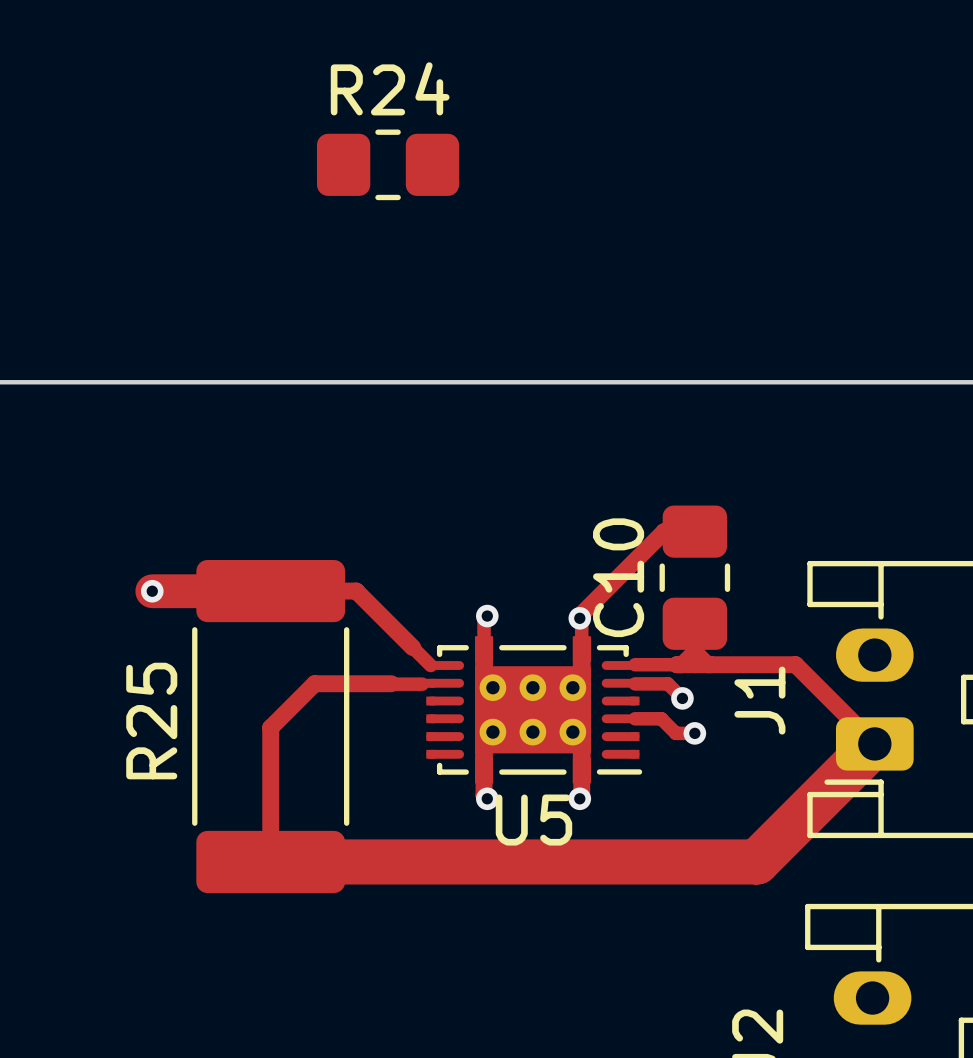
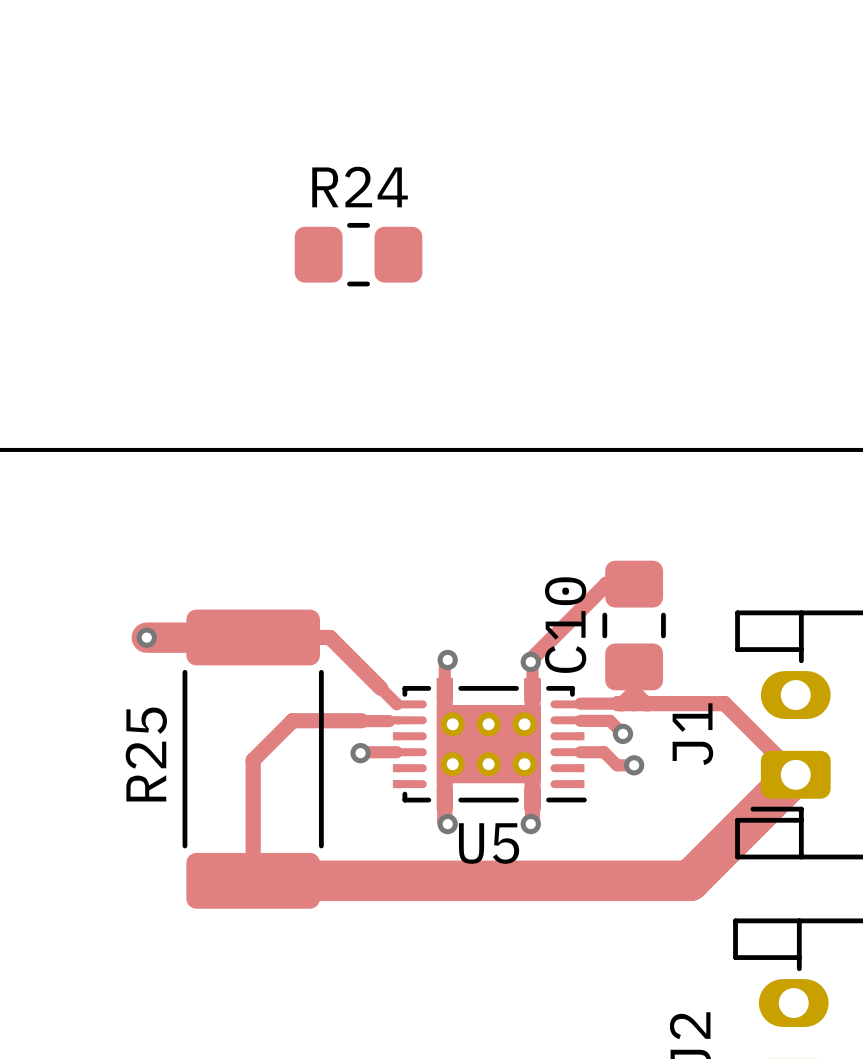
track: none -> (396, 752) (360, 753)
via: none -> (360, 753)

